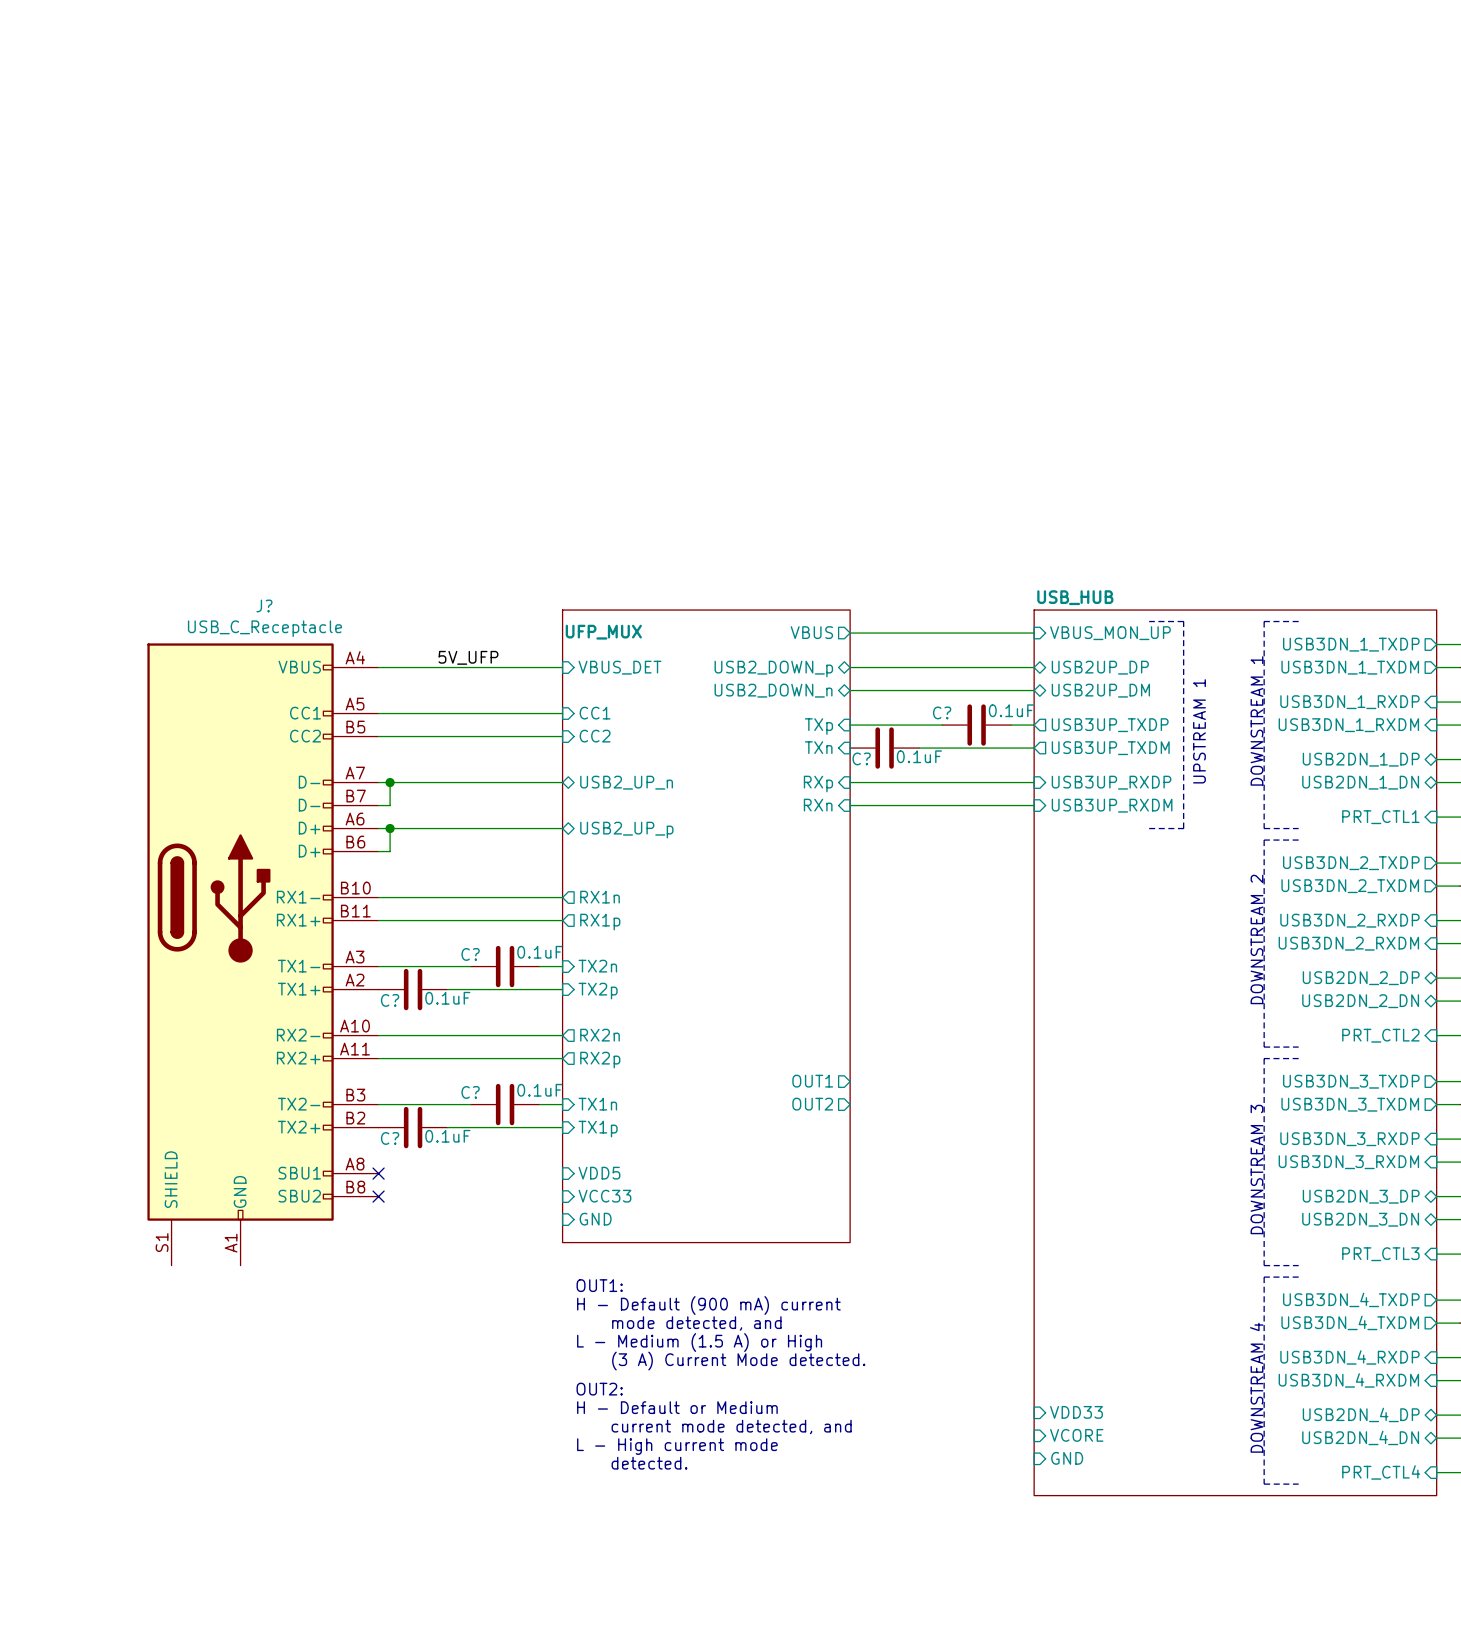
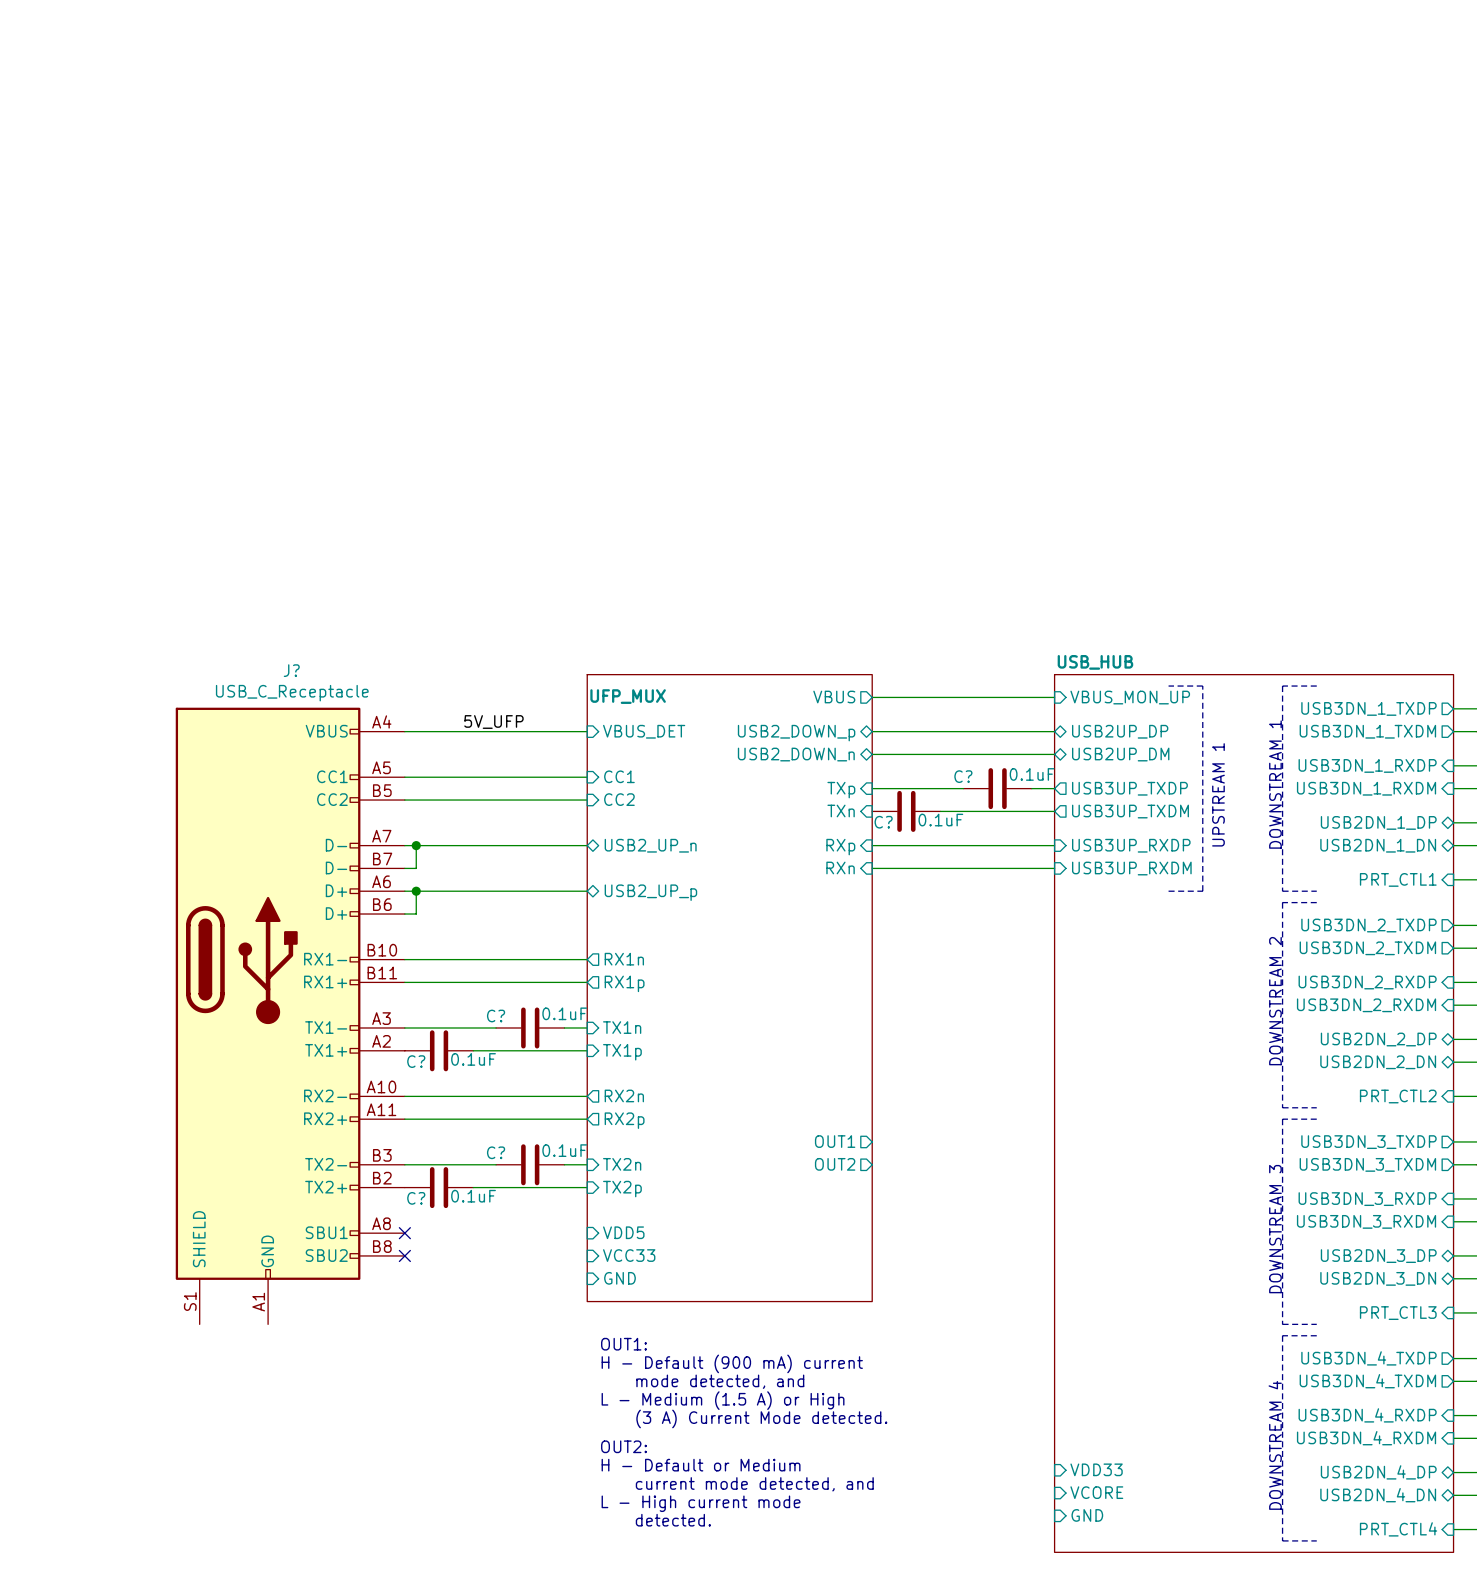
sheet pin: TX2n (597, 966) -> TX1n (622, 1027)
sheet pin: TX2p (598, 991) -> TX1p (622, 1052)
sheet pin: TX1n (597, 1104) -> TX2n (622, 1164)
sheet pin: TX1p (598, 1129) -> TX2p (622, 1189)

